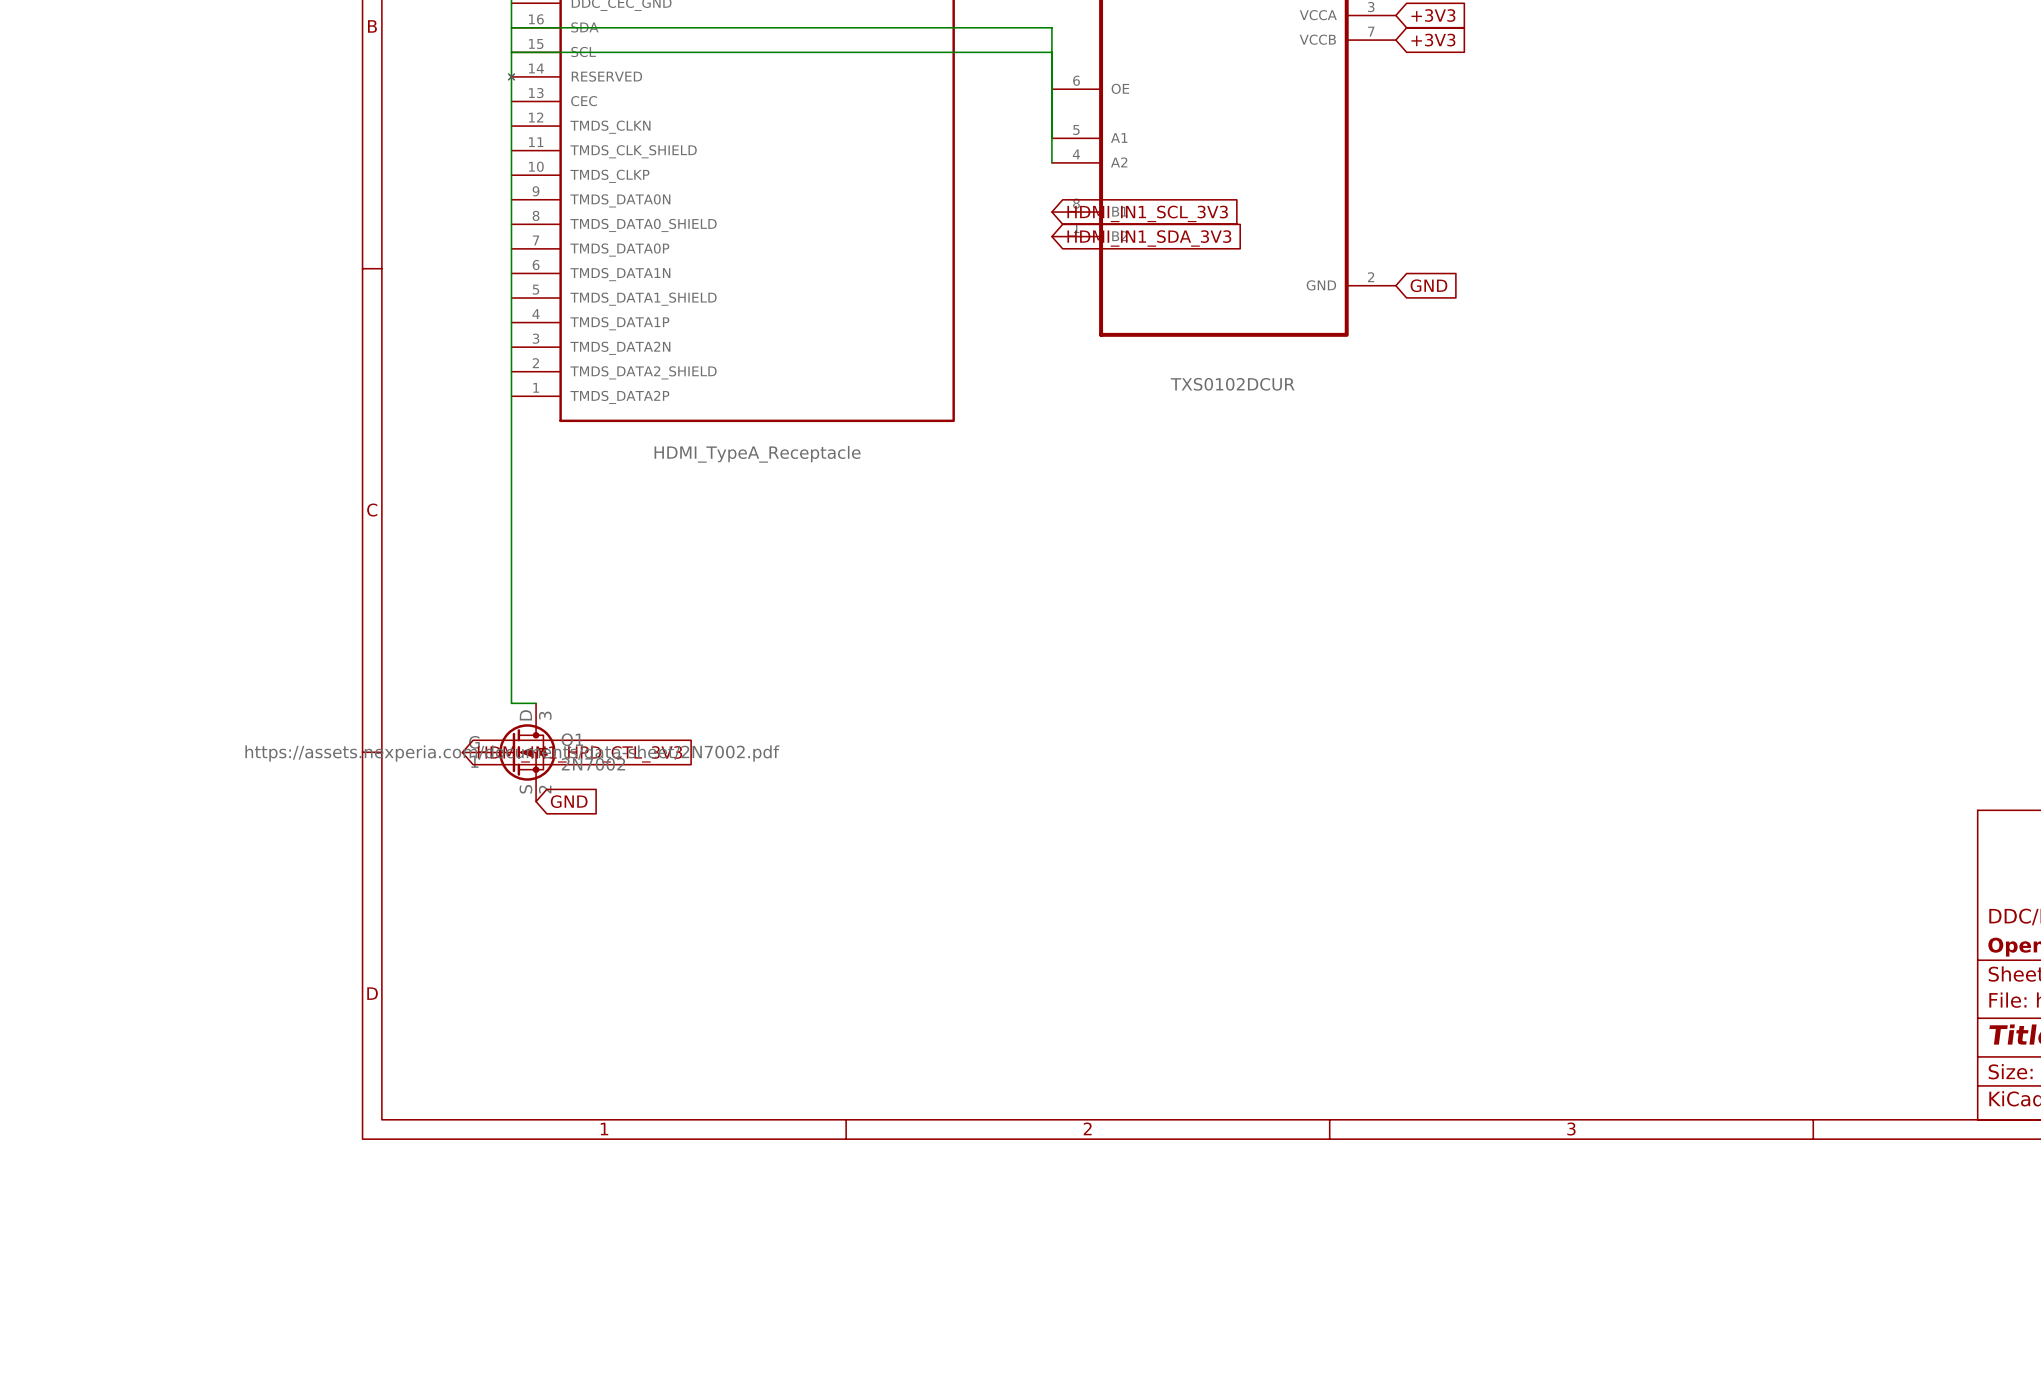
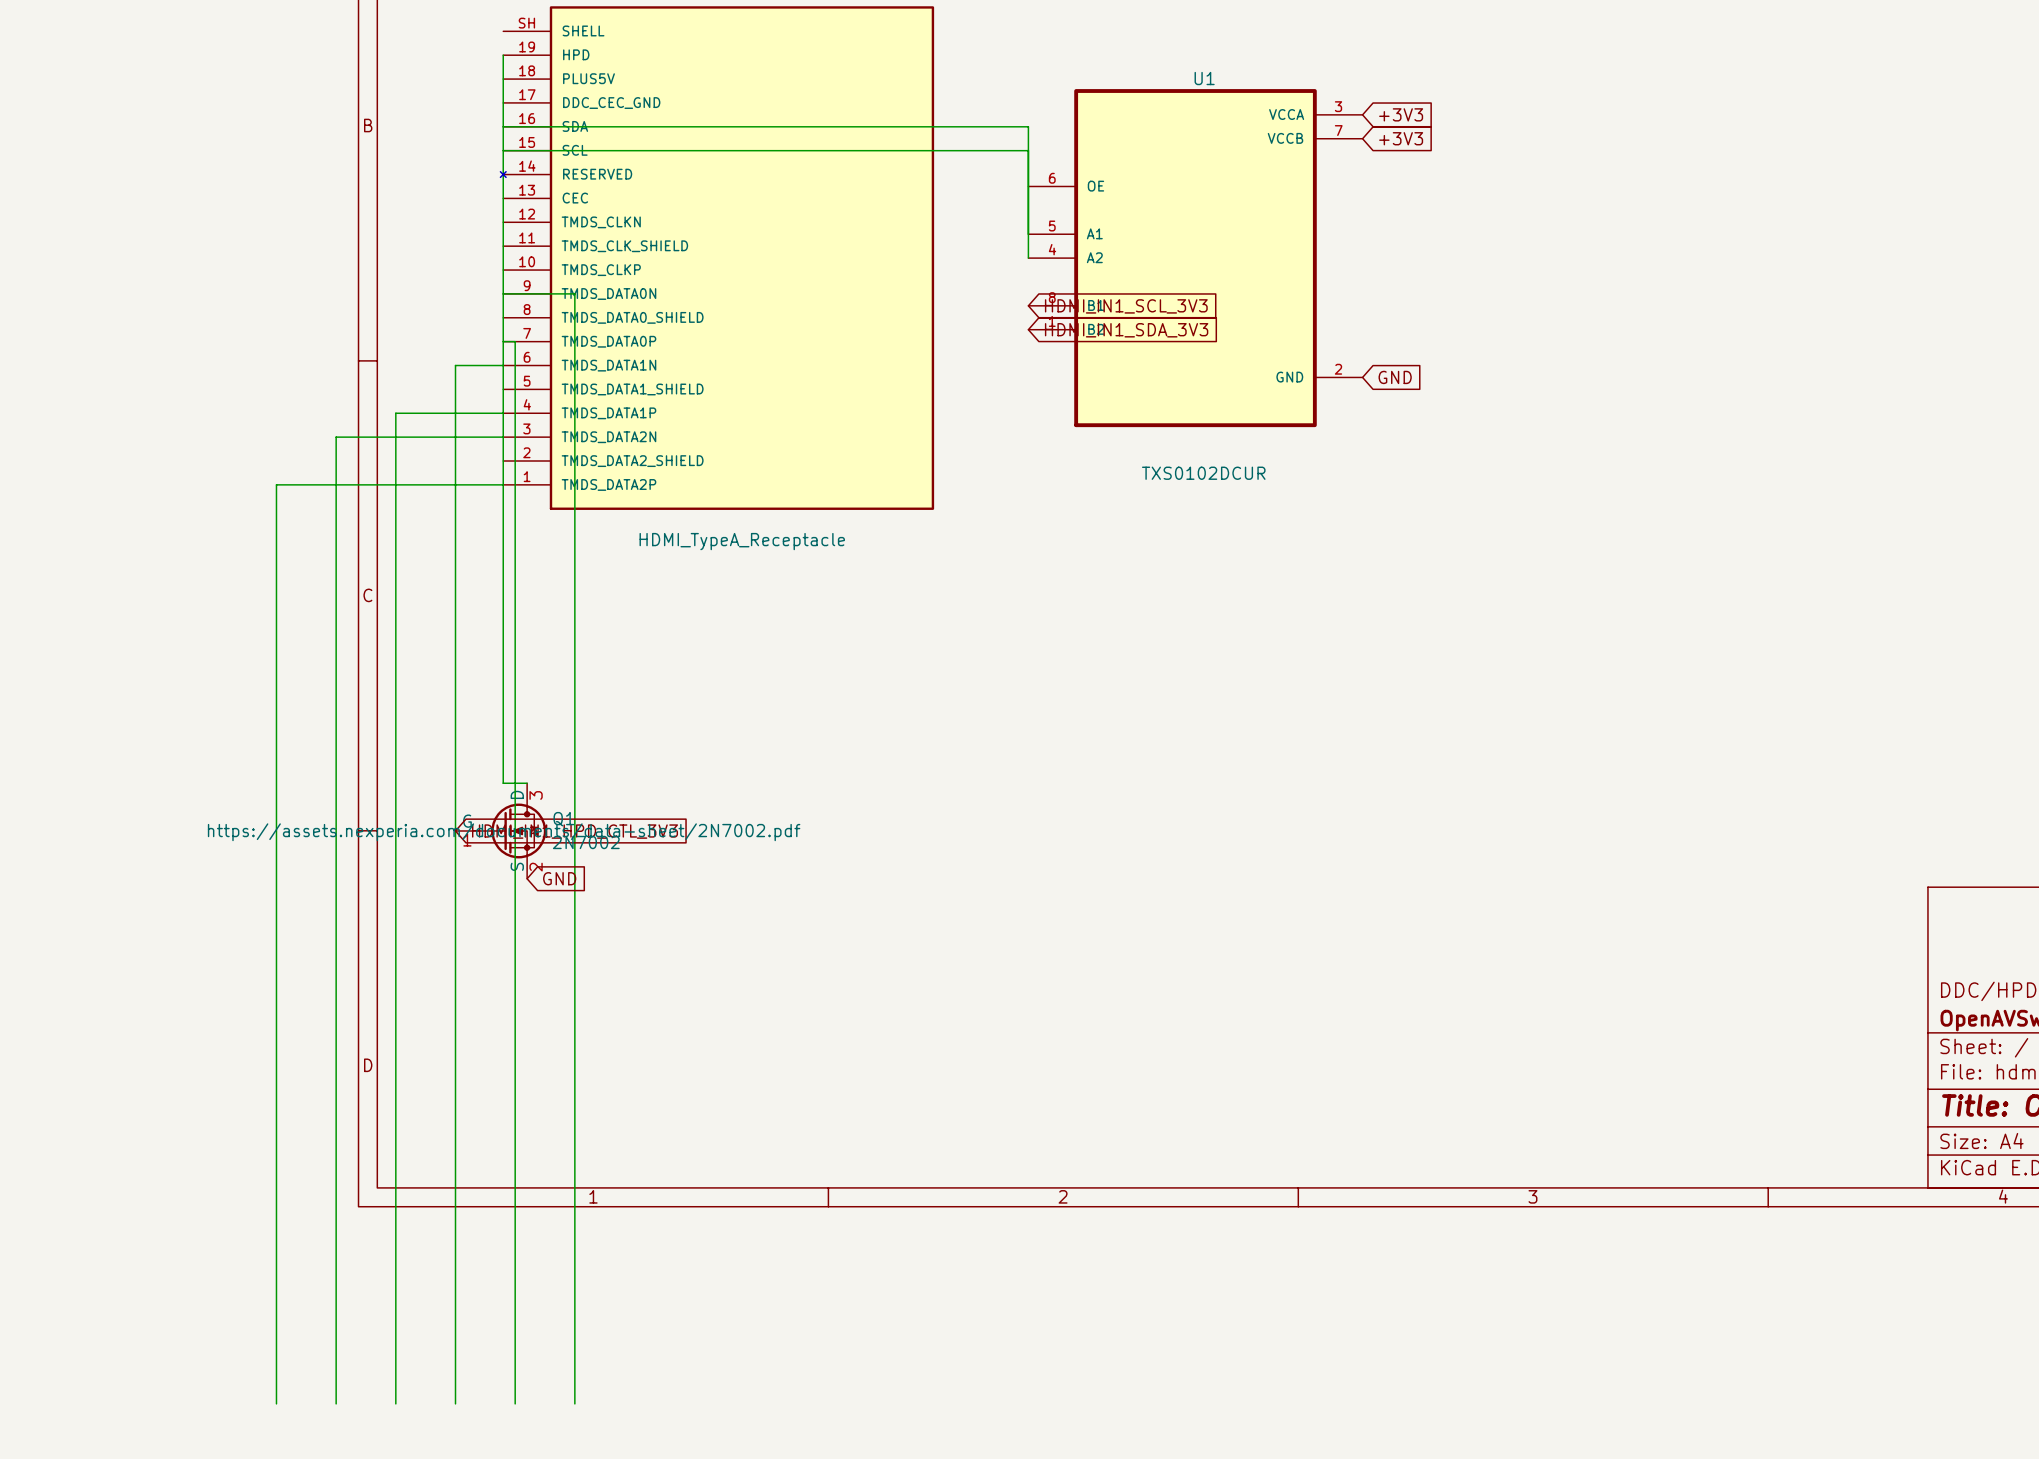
wire: none -> (503, 293) (574, 293) (574, 1403)
wire: none -> (503, 341) (515, 341) (515, 1403)
wire: none -> (503, 365) (455, 365) (455, 1403)
wire: none -> (503, 413) (395, 413) (395, 1403)
wire: none -> (503, 437) (336, 437) (336, 1403)
wire: none -> (503, 484) (276, 484) (276, 1403)

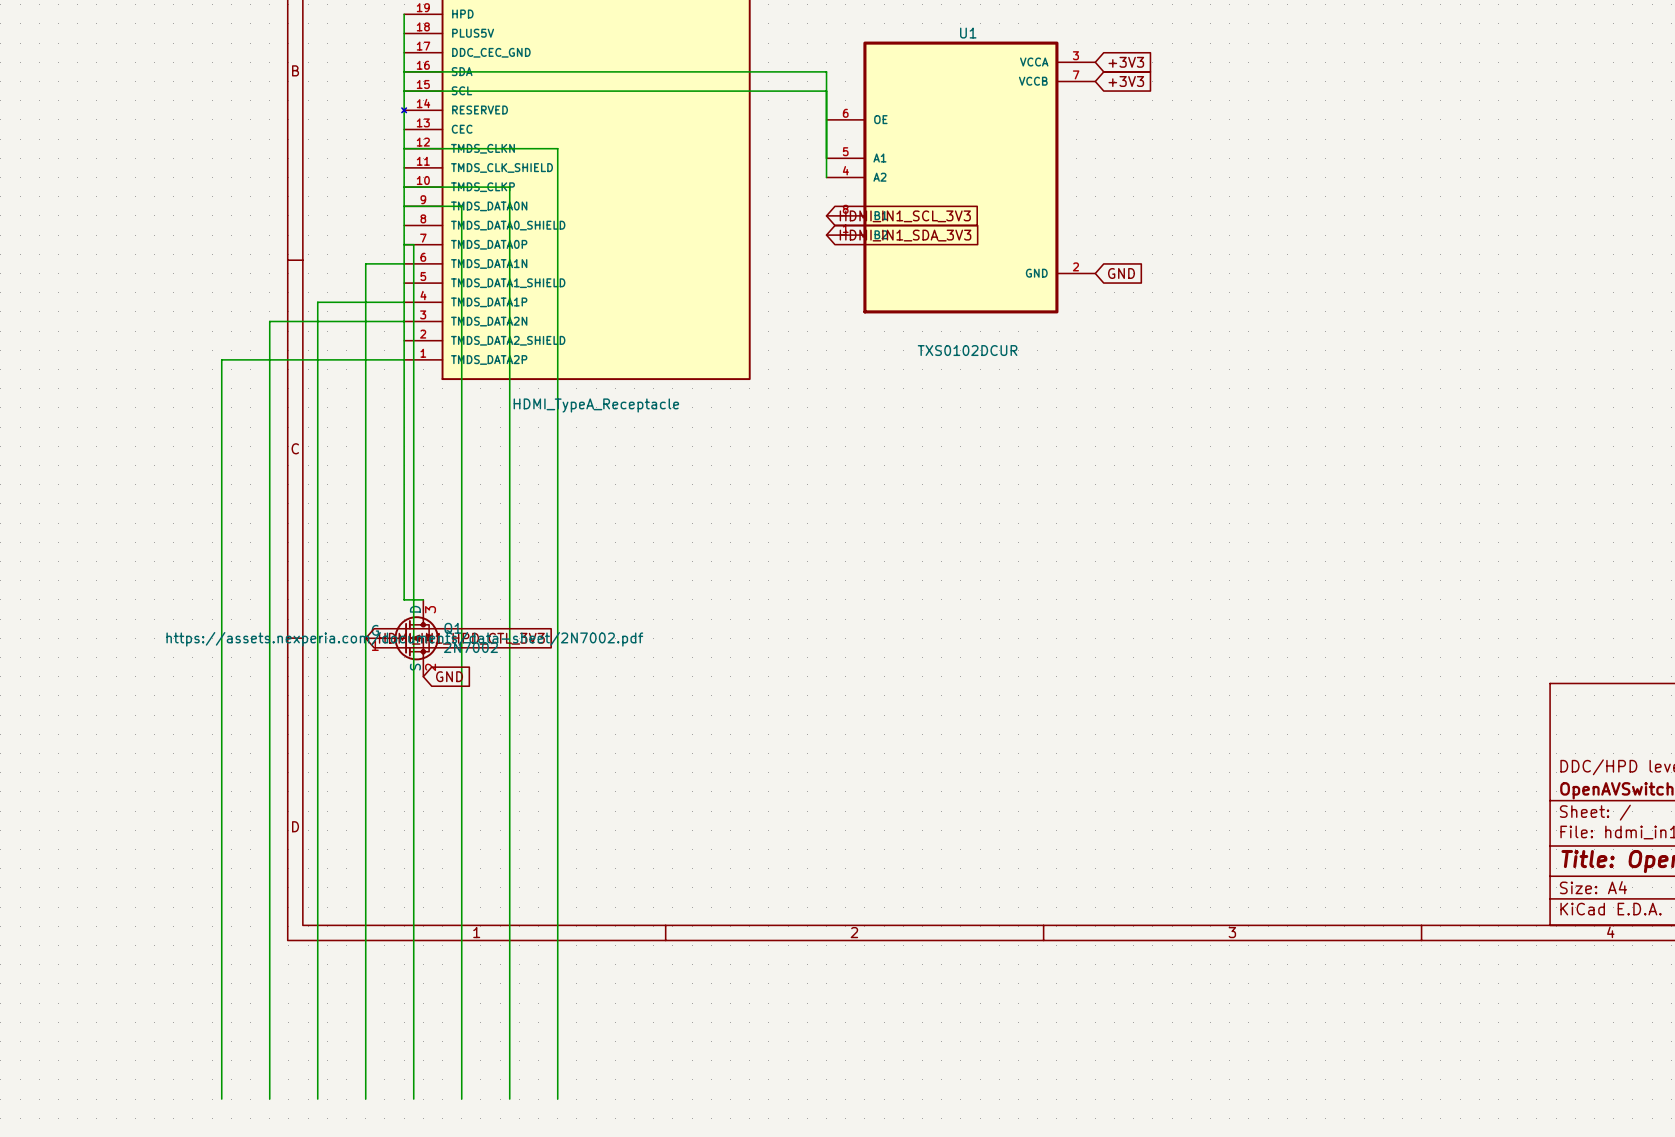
wire: none -> (404, 148) (557, 148) (557, 1099)
wire: none -> (404, 187) (509, 187) (509, 1099)

